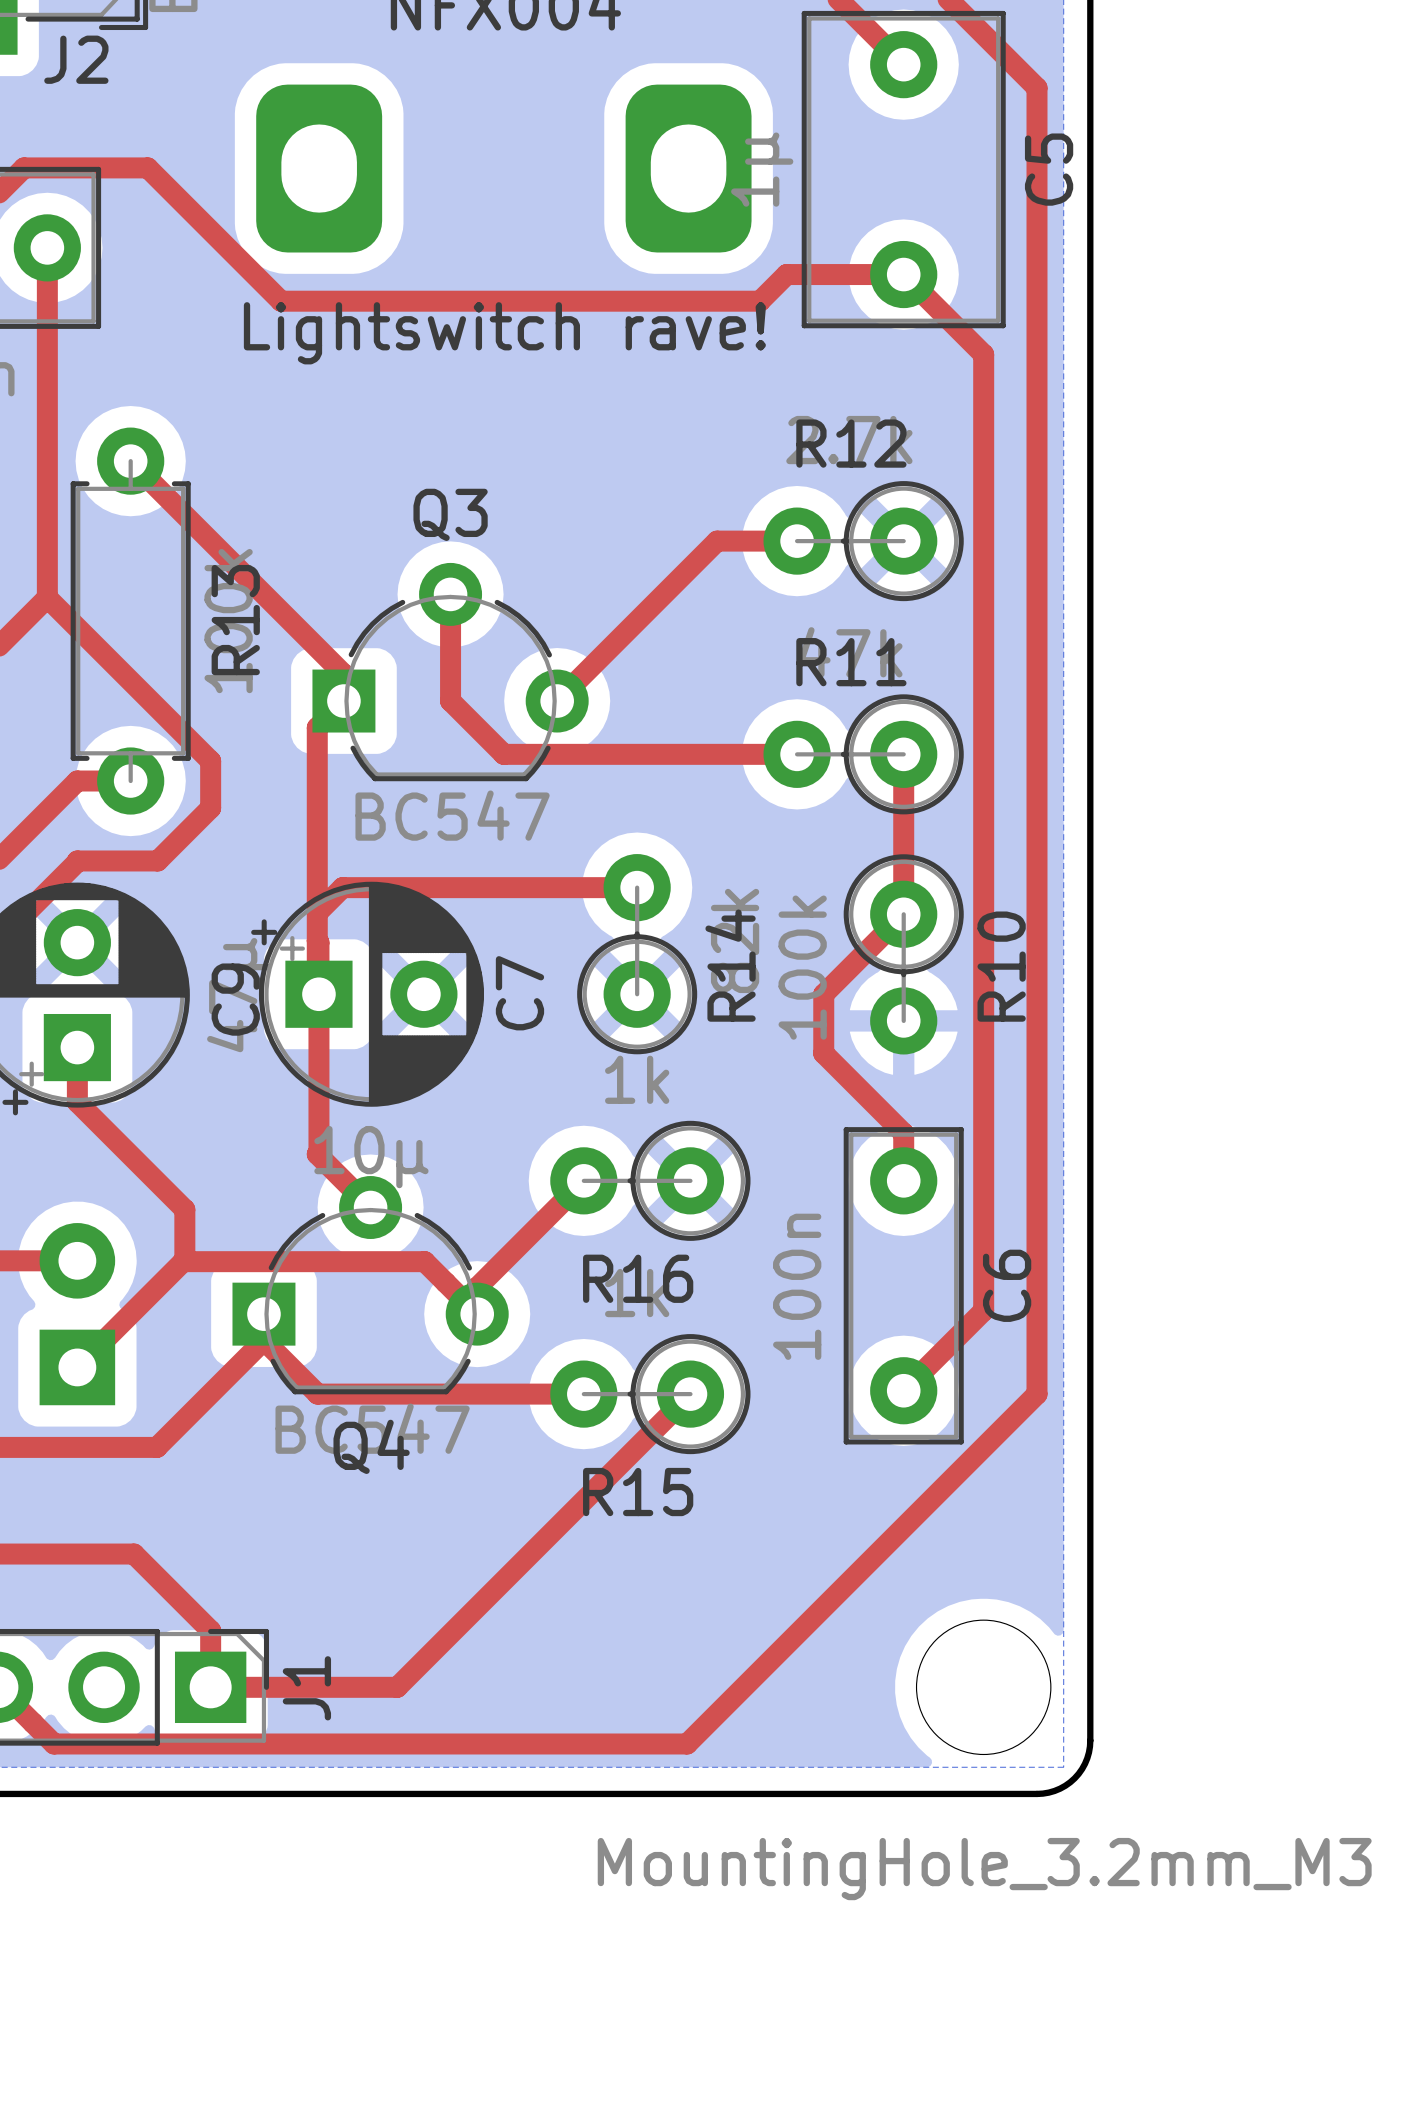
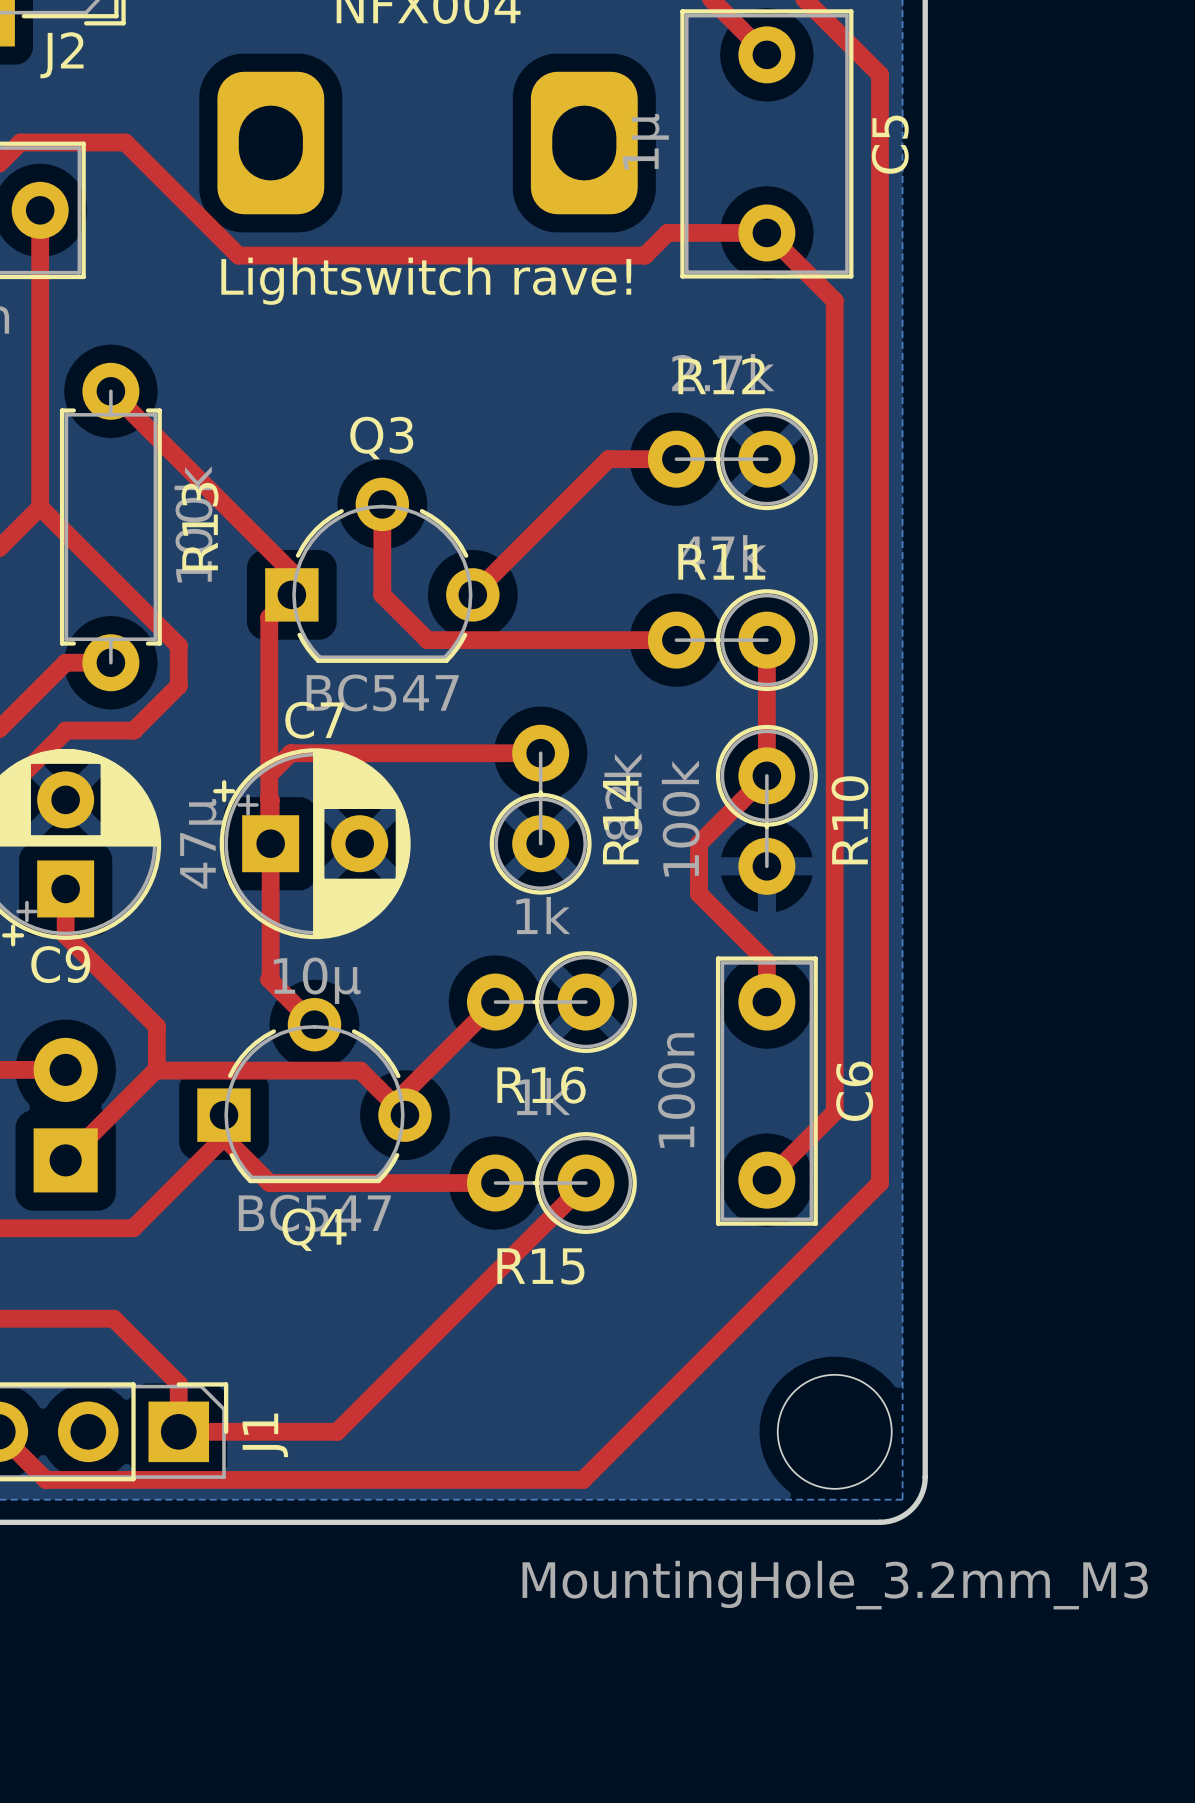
C7 name rotation: 0° (519, 993) -> 90° clockwise (314, 720)
C7 name position: C7 (519, 993) -> C7 (314, 720)
C9 name rotation: 0° (235, 999) -> 90° clockwise (60, 964)
C9 name position: C9 (235, 999) -> C9 (60, 964)

